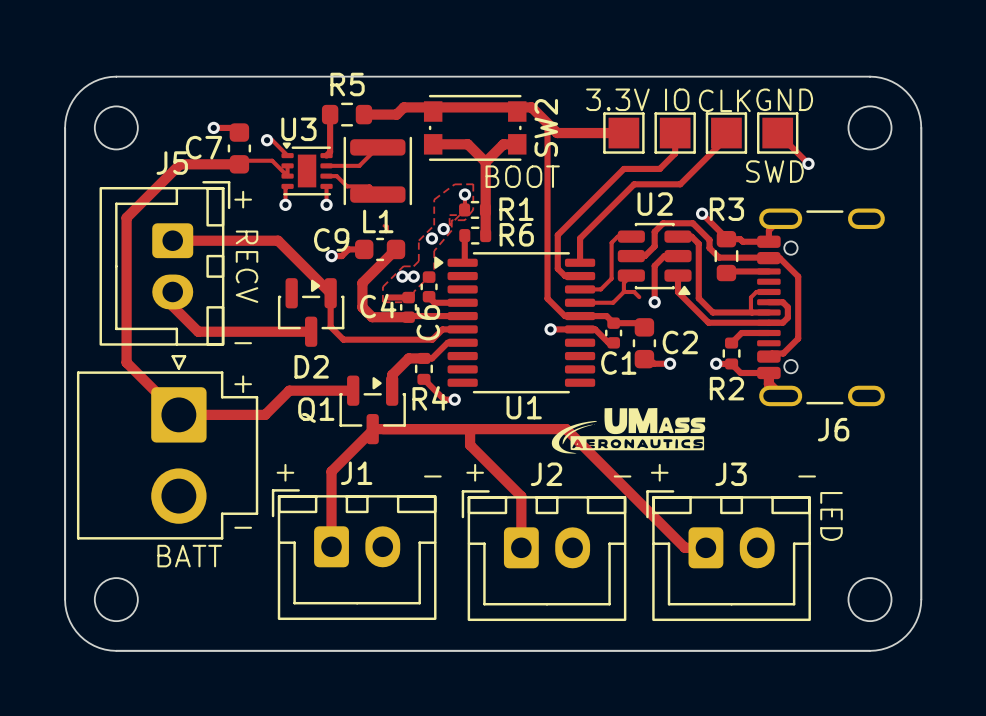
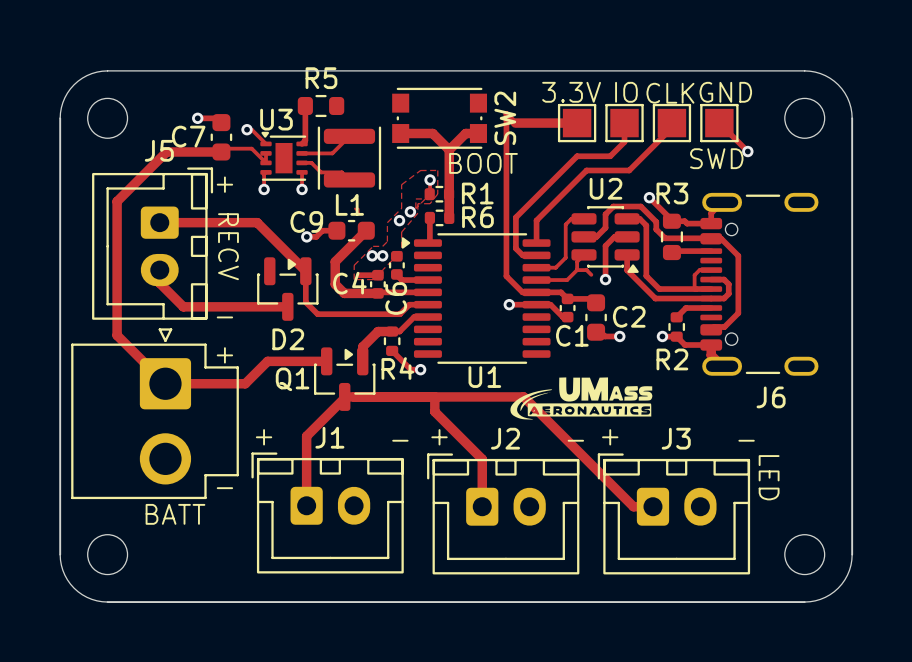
track: (363, 114) (396, 114) (403, 107) (531, 107) (557, 133) -> none

